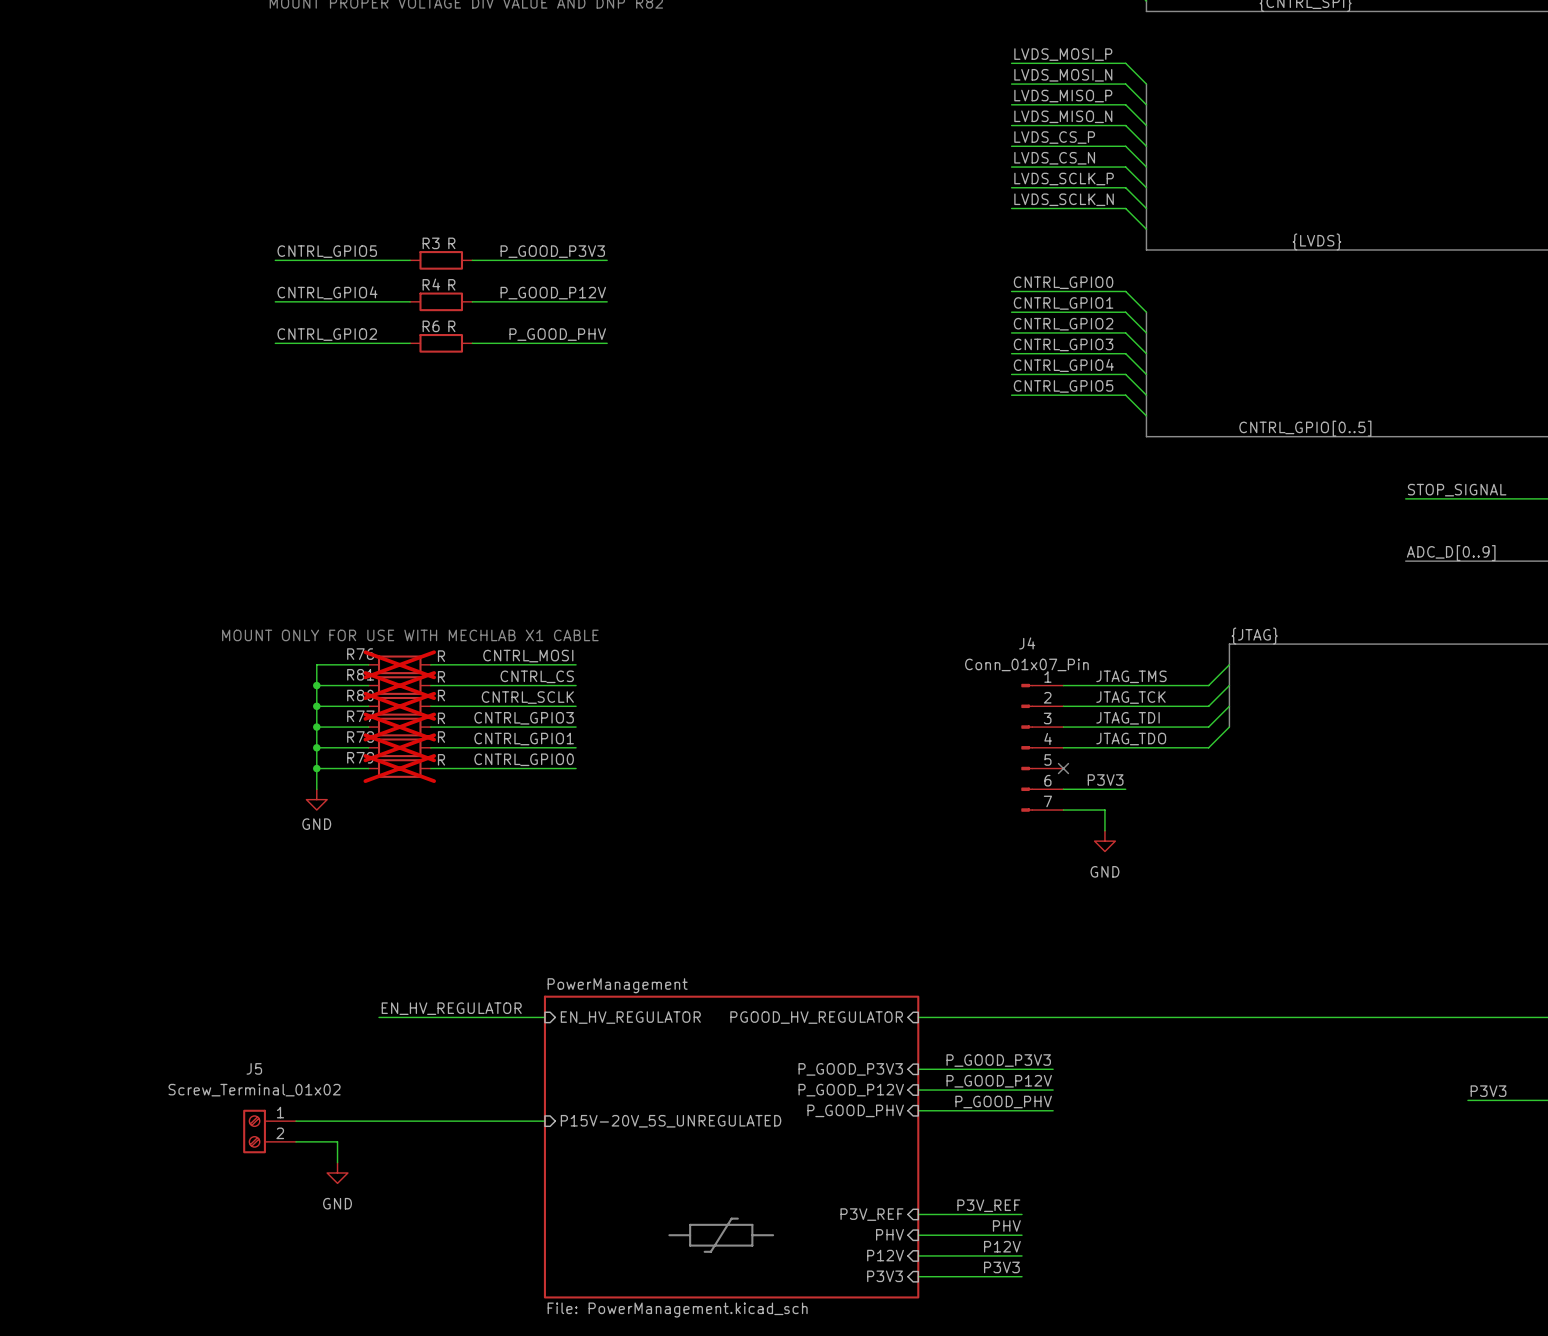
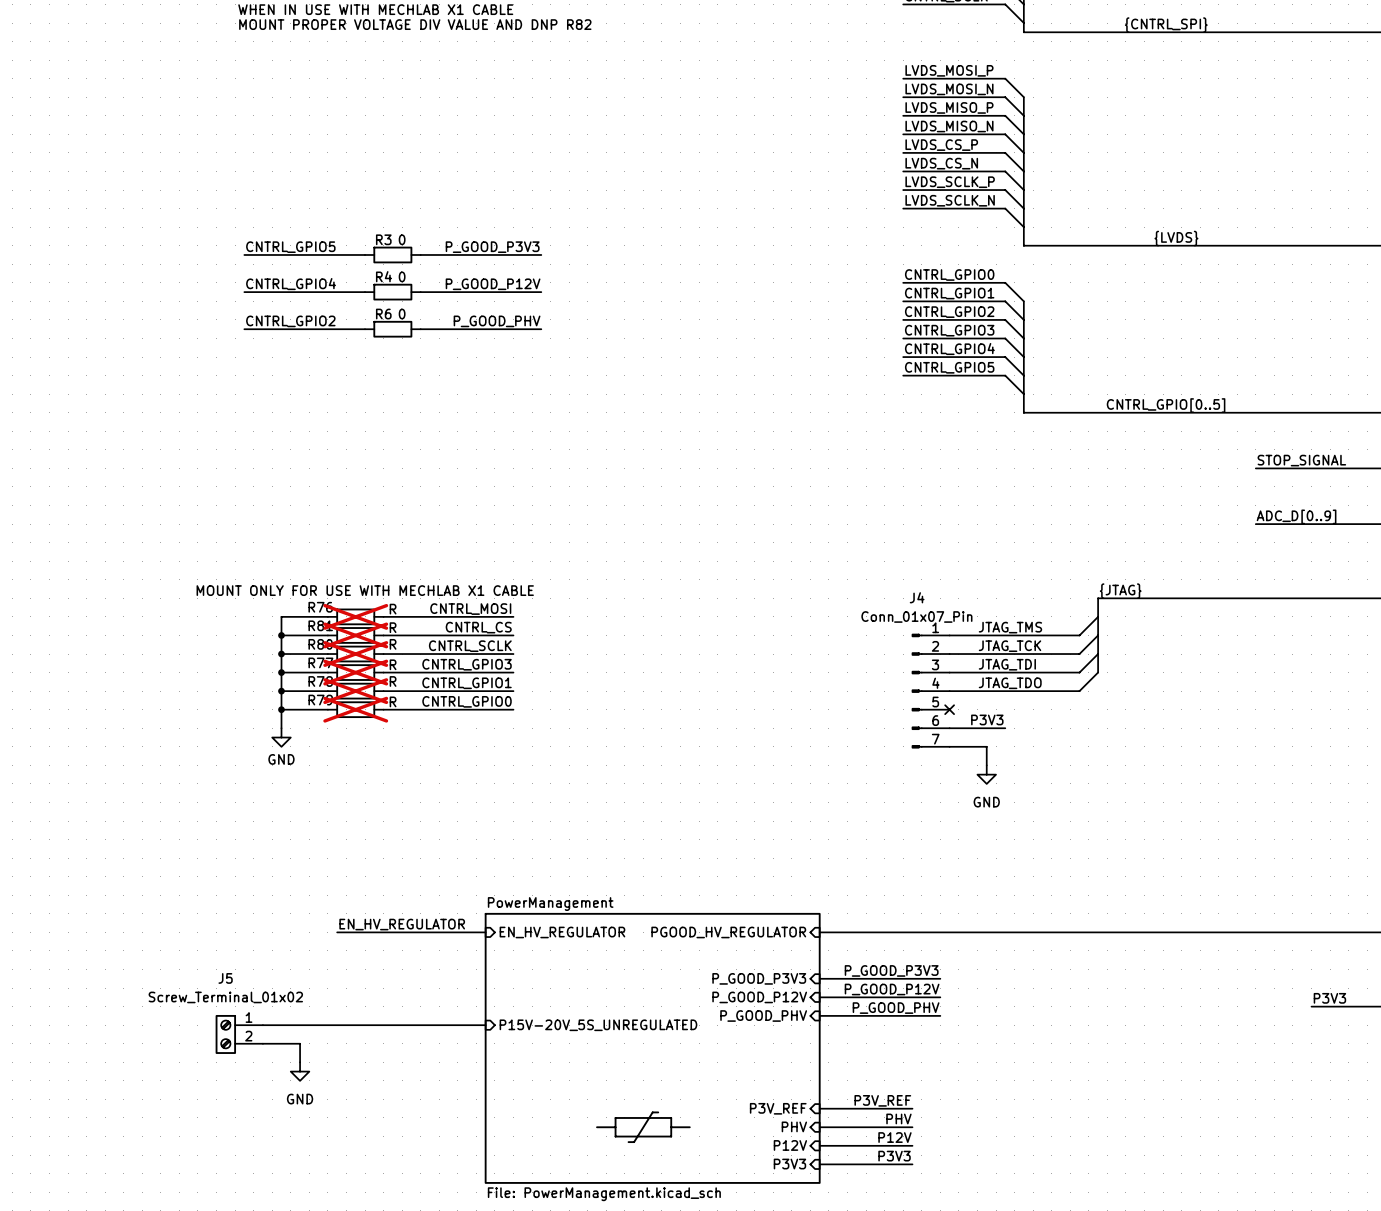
R3 value: R (451, 243) -> 0 (402, 239)
R4 value: R (451, 284) -> 0 (402, 276)
R6 value: R (451, 326) -> 0 (402, 314)

